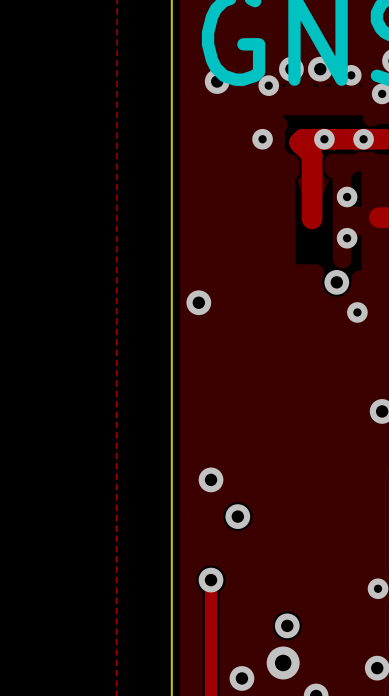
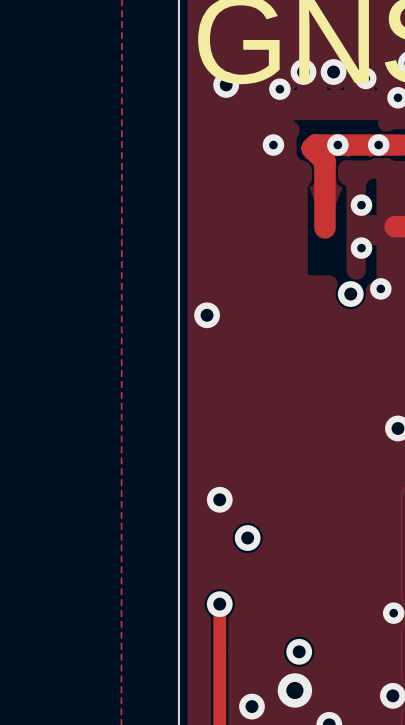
via position: (357, 312) -> (380, 288)

